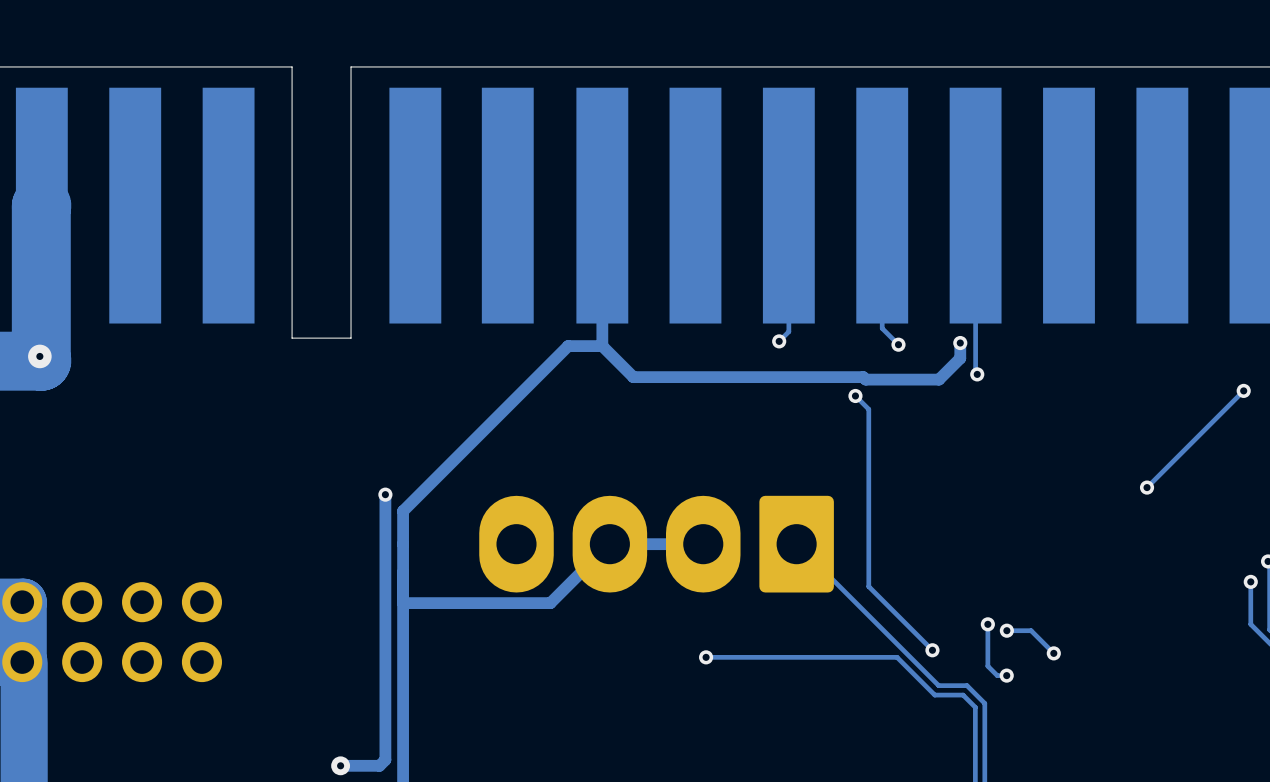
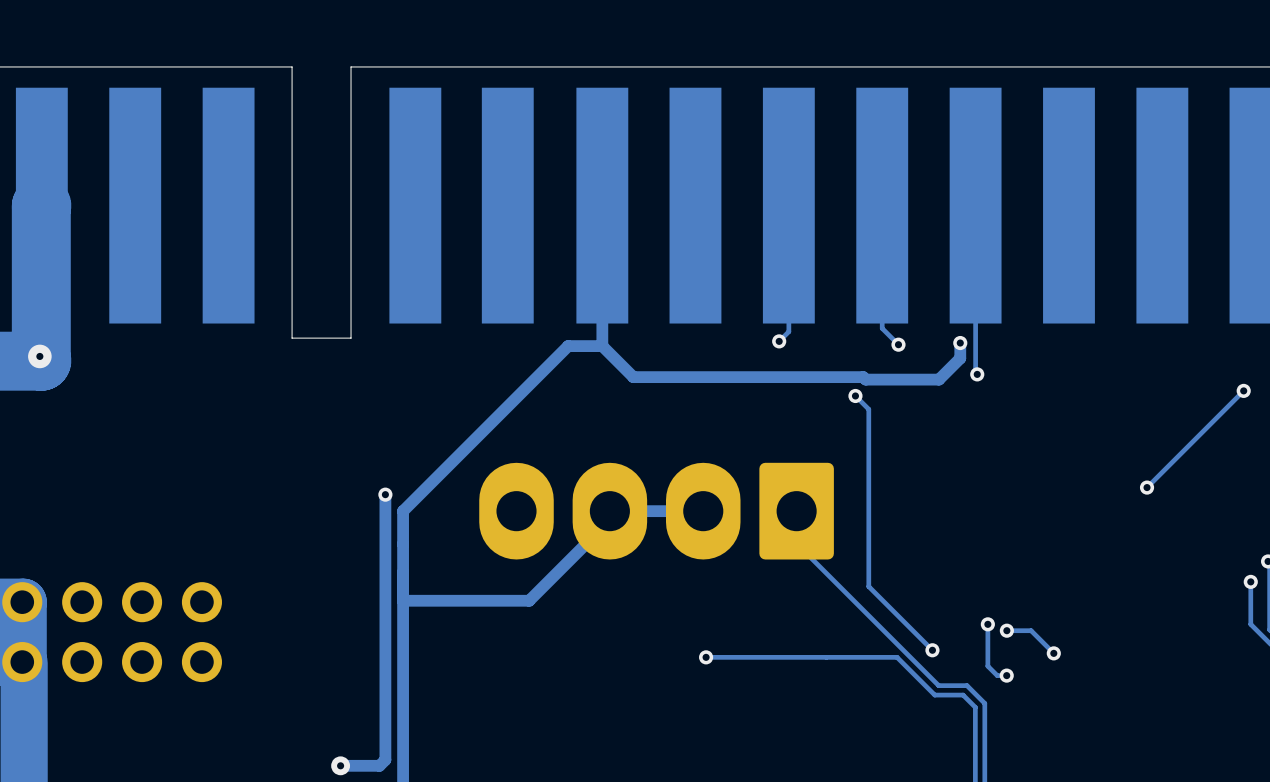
track: none -> (703, 511) (609, 511) (609, 520) (529, 600) (403, 600)
part position: (656, 544) -> (656, 511)
track: (703, 544) (609, 544) (550, 603) (403, 603) -> none

